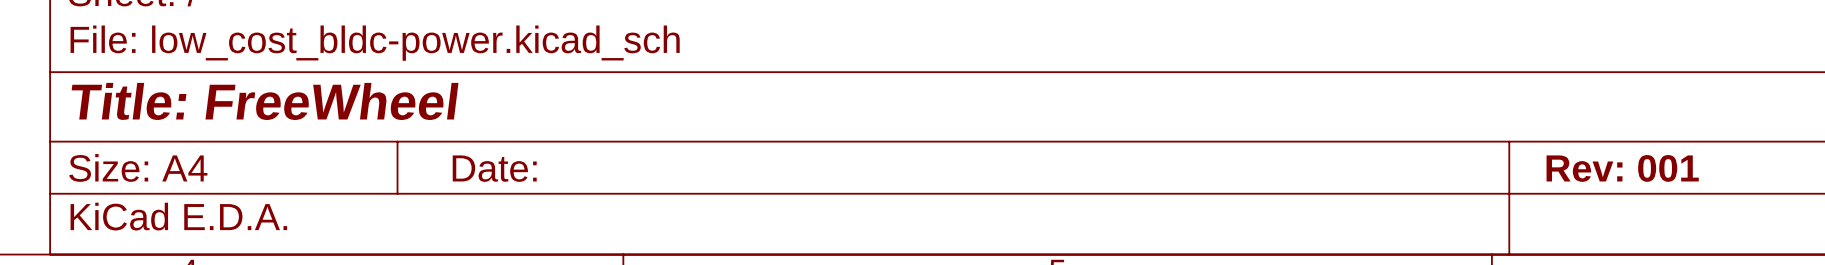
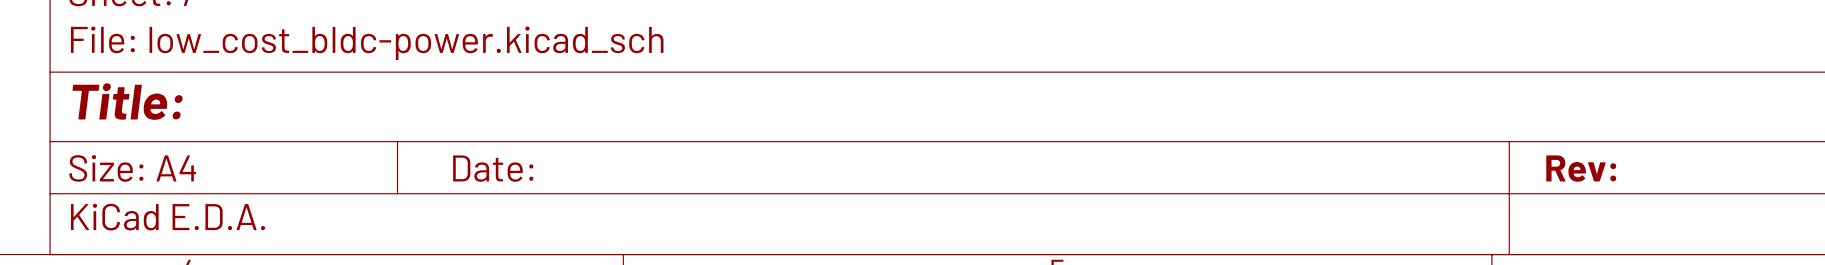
title block: Title: FreeWheel (265, 101) -> Title: (127, 101)
title block: Rev: 001 (1622, 168) -> Rev: (1581, 168)

